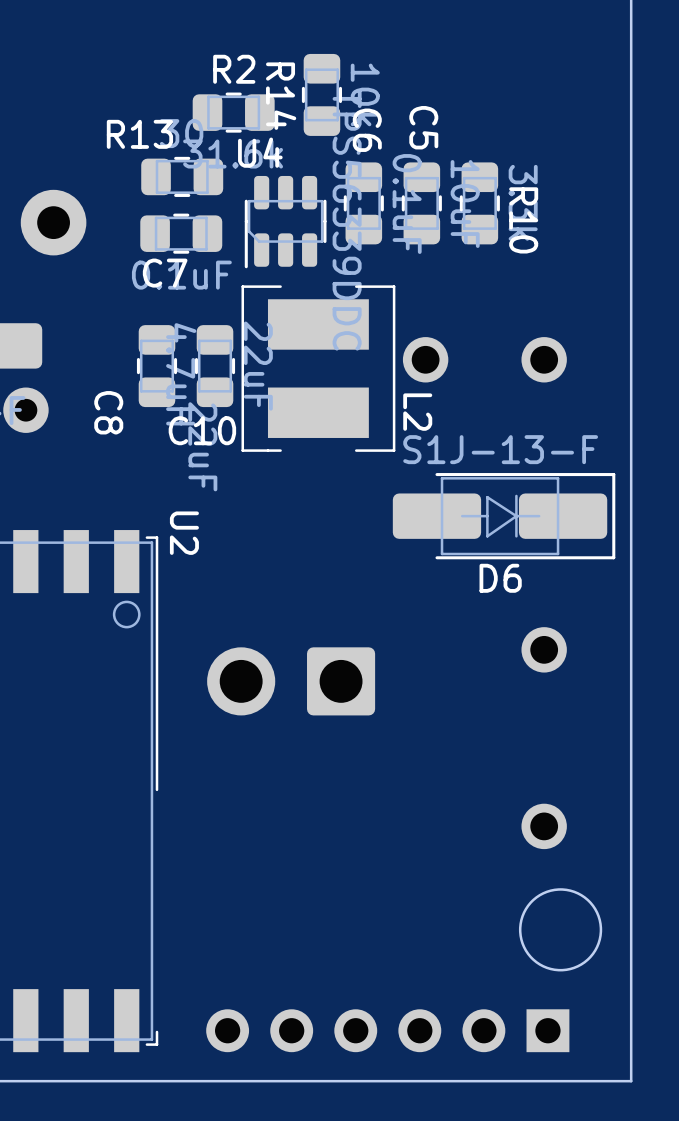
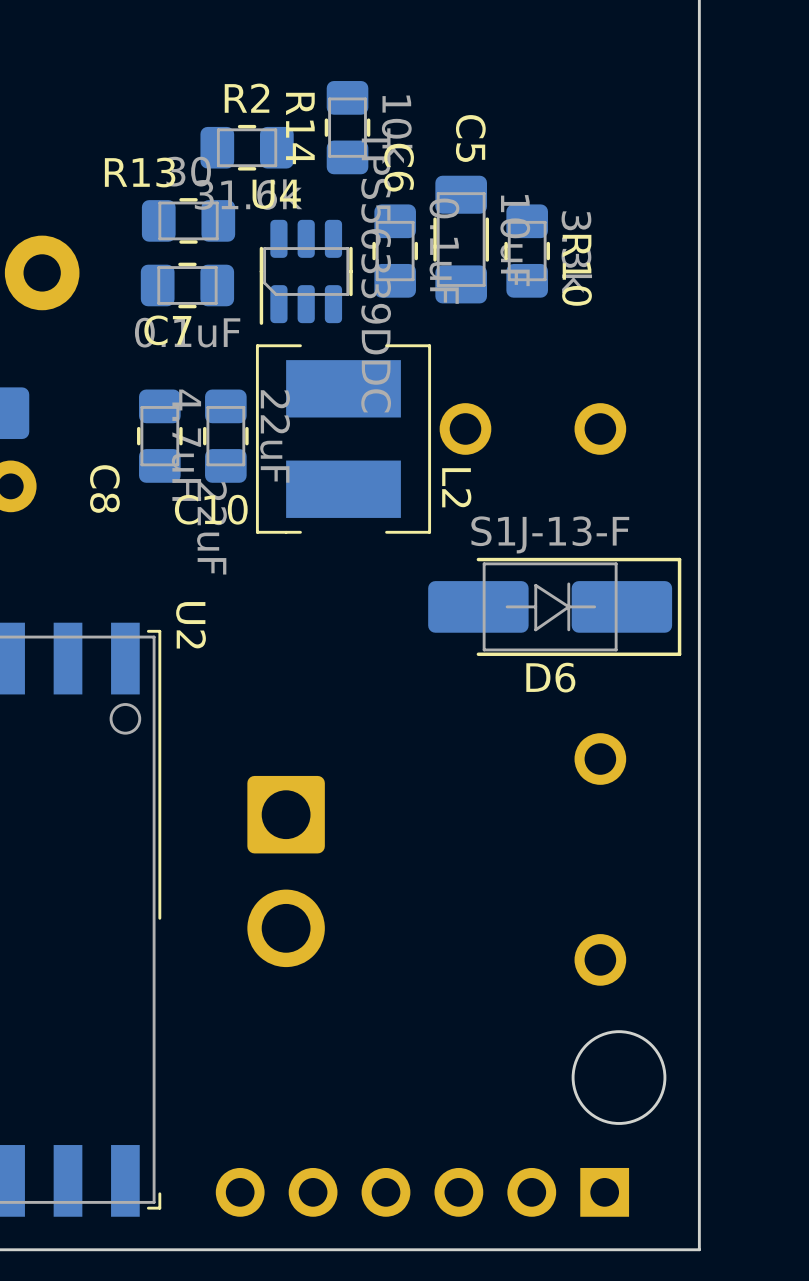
C5 footprint: [401, 162, 442, 245] -> [433, 175, 490, 304]
part rotation: 0° (291, 681) -> 90° counterclockwise (286, 871)

